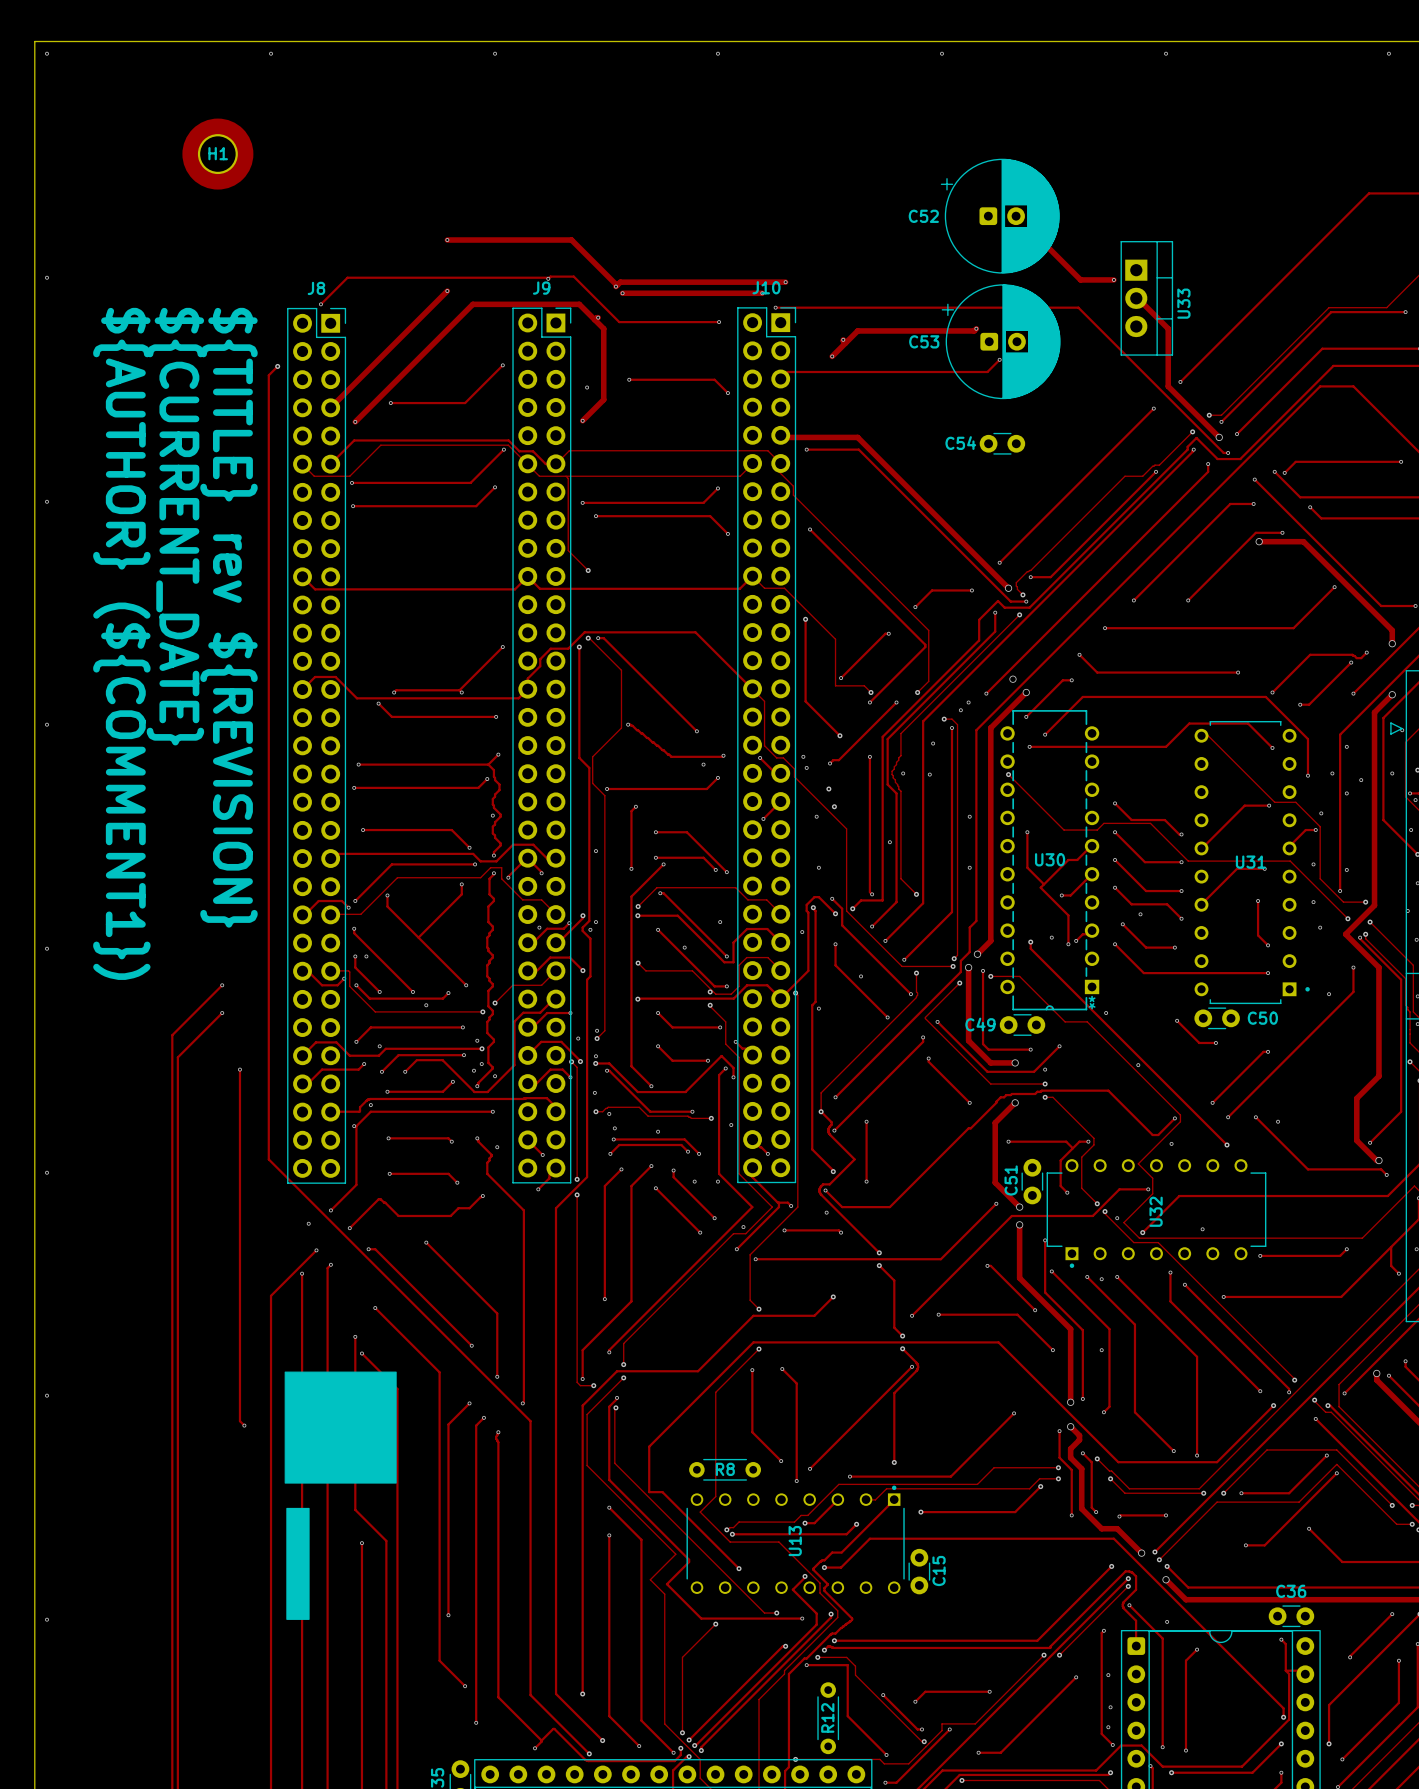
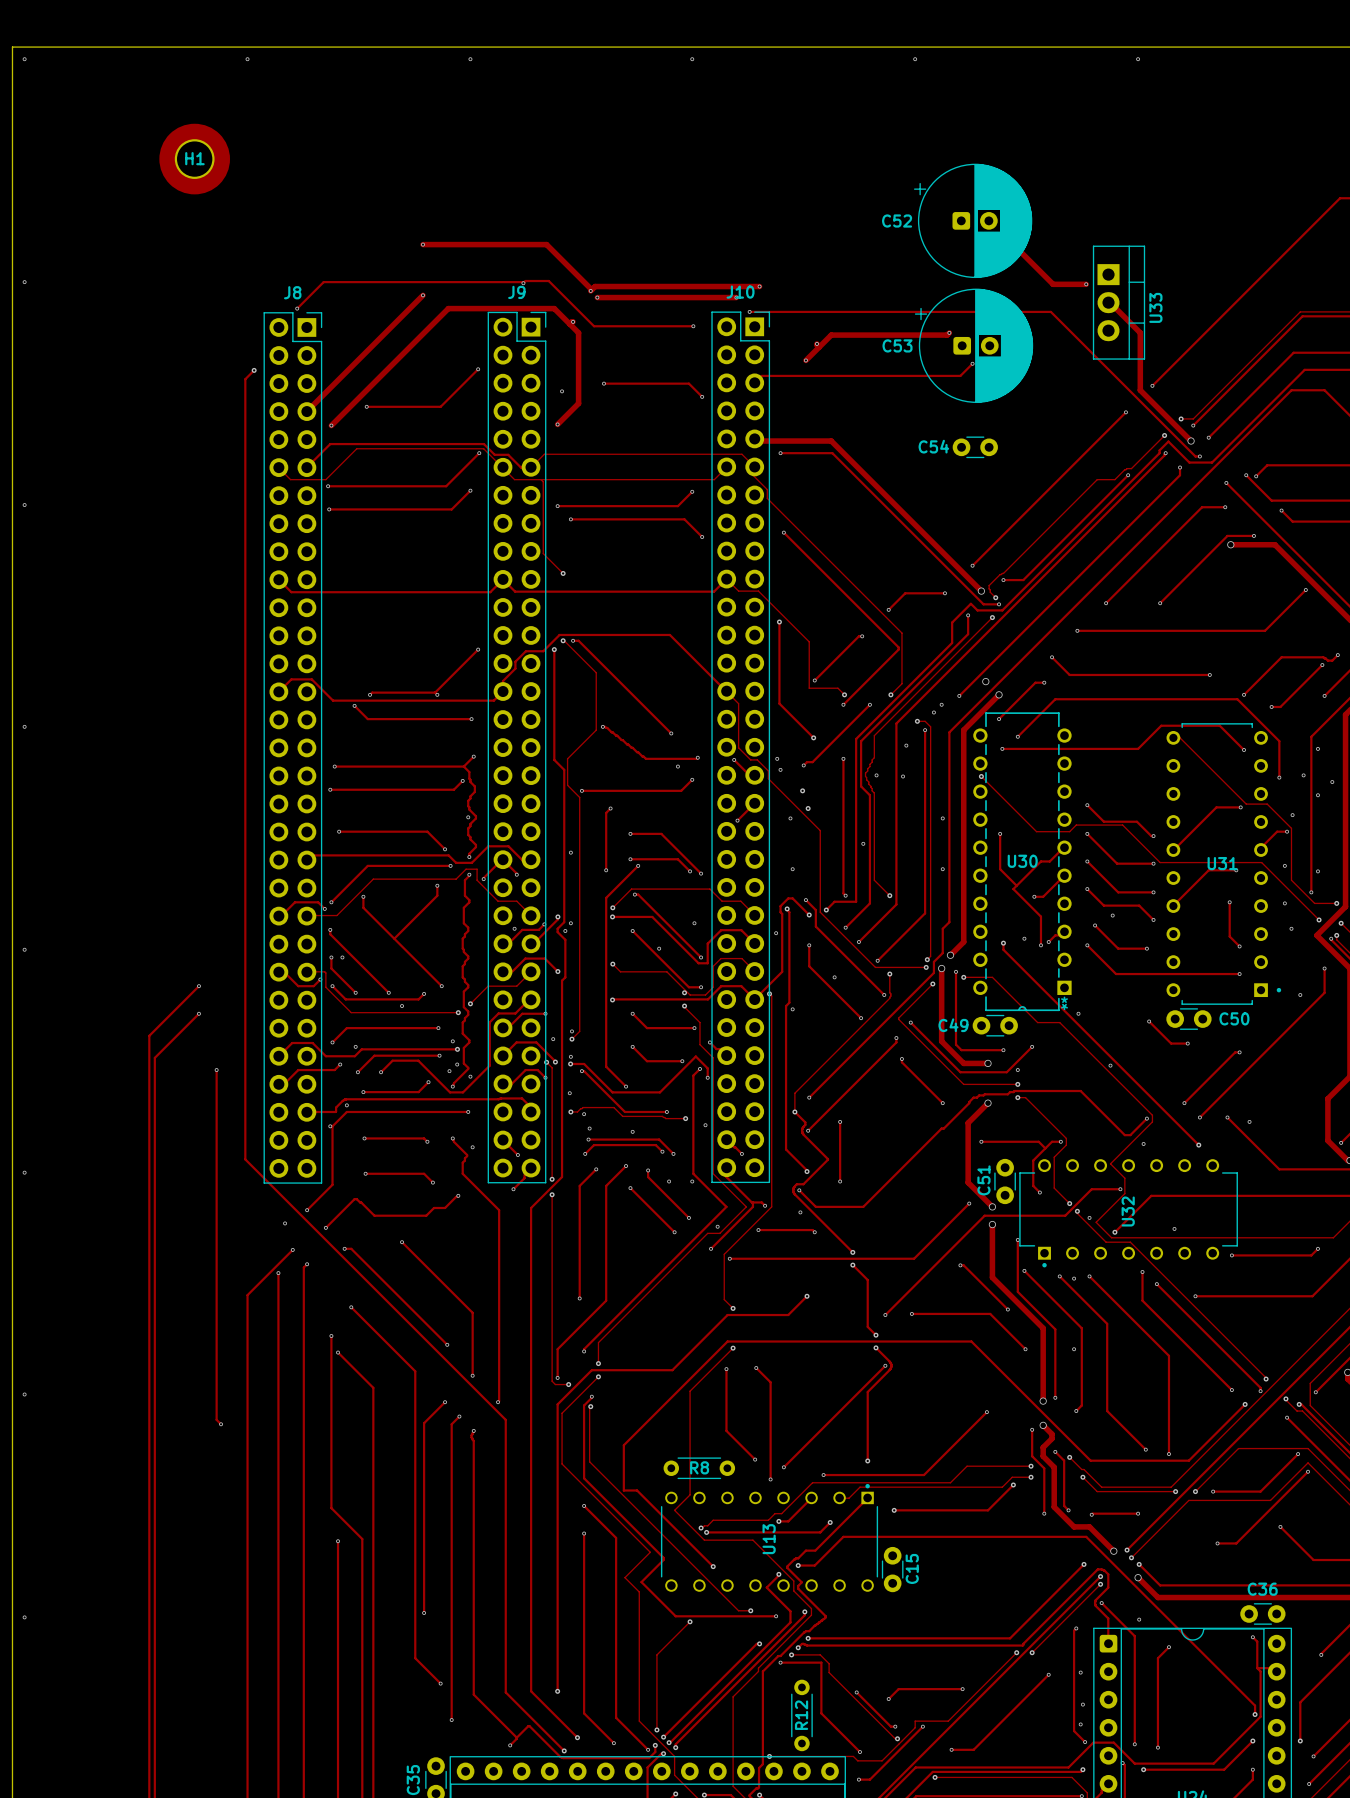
text: ${CURRENT_DATE} (175, 526) -> none
text: ${TITLE} rev ${REVISION} (228, 617) -> none
text: ${AUTHOR} (${COMMENT1}) (121, 643) -> none
drawing: [284, 1371, 397, 1484] -> none
drawing: [286, 1507, 310, 1620] -> none

